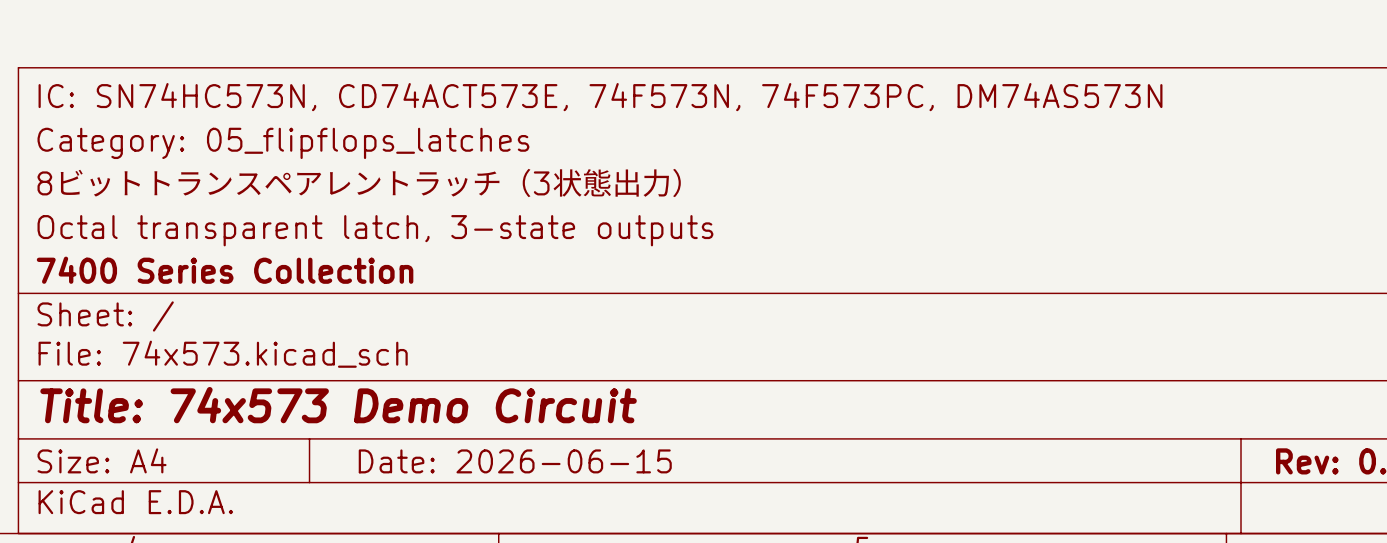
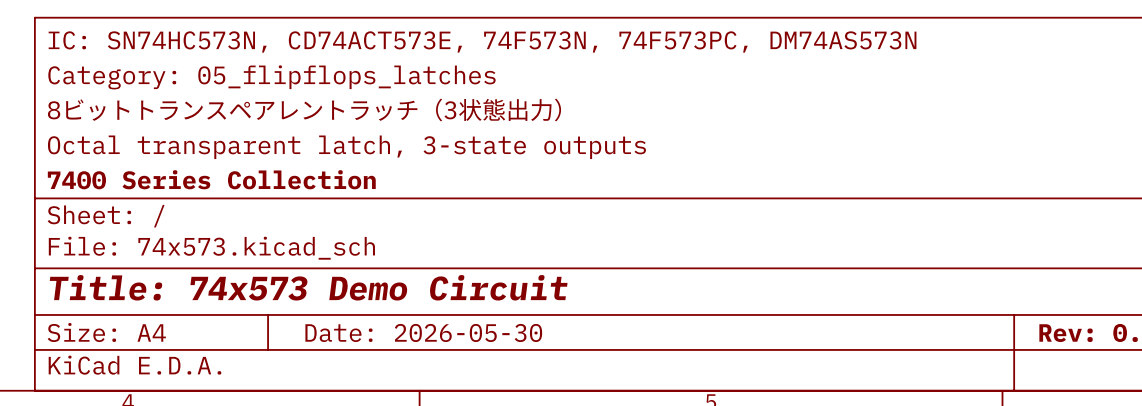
title block: Date: 2026-06-15 (515, 461) -> Date: 2026-05-30 (423, 332)

